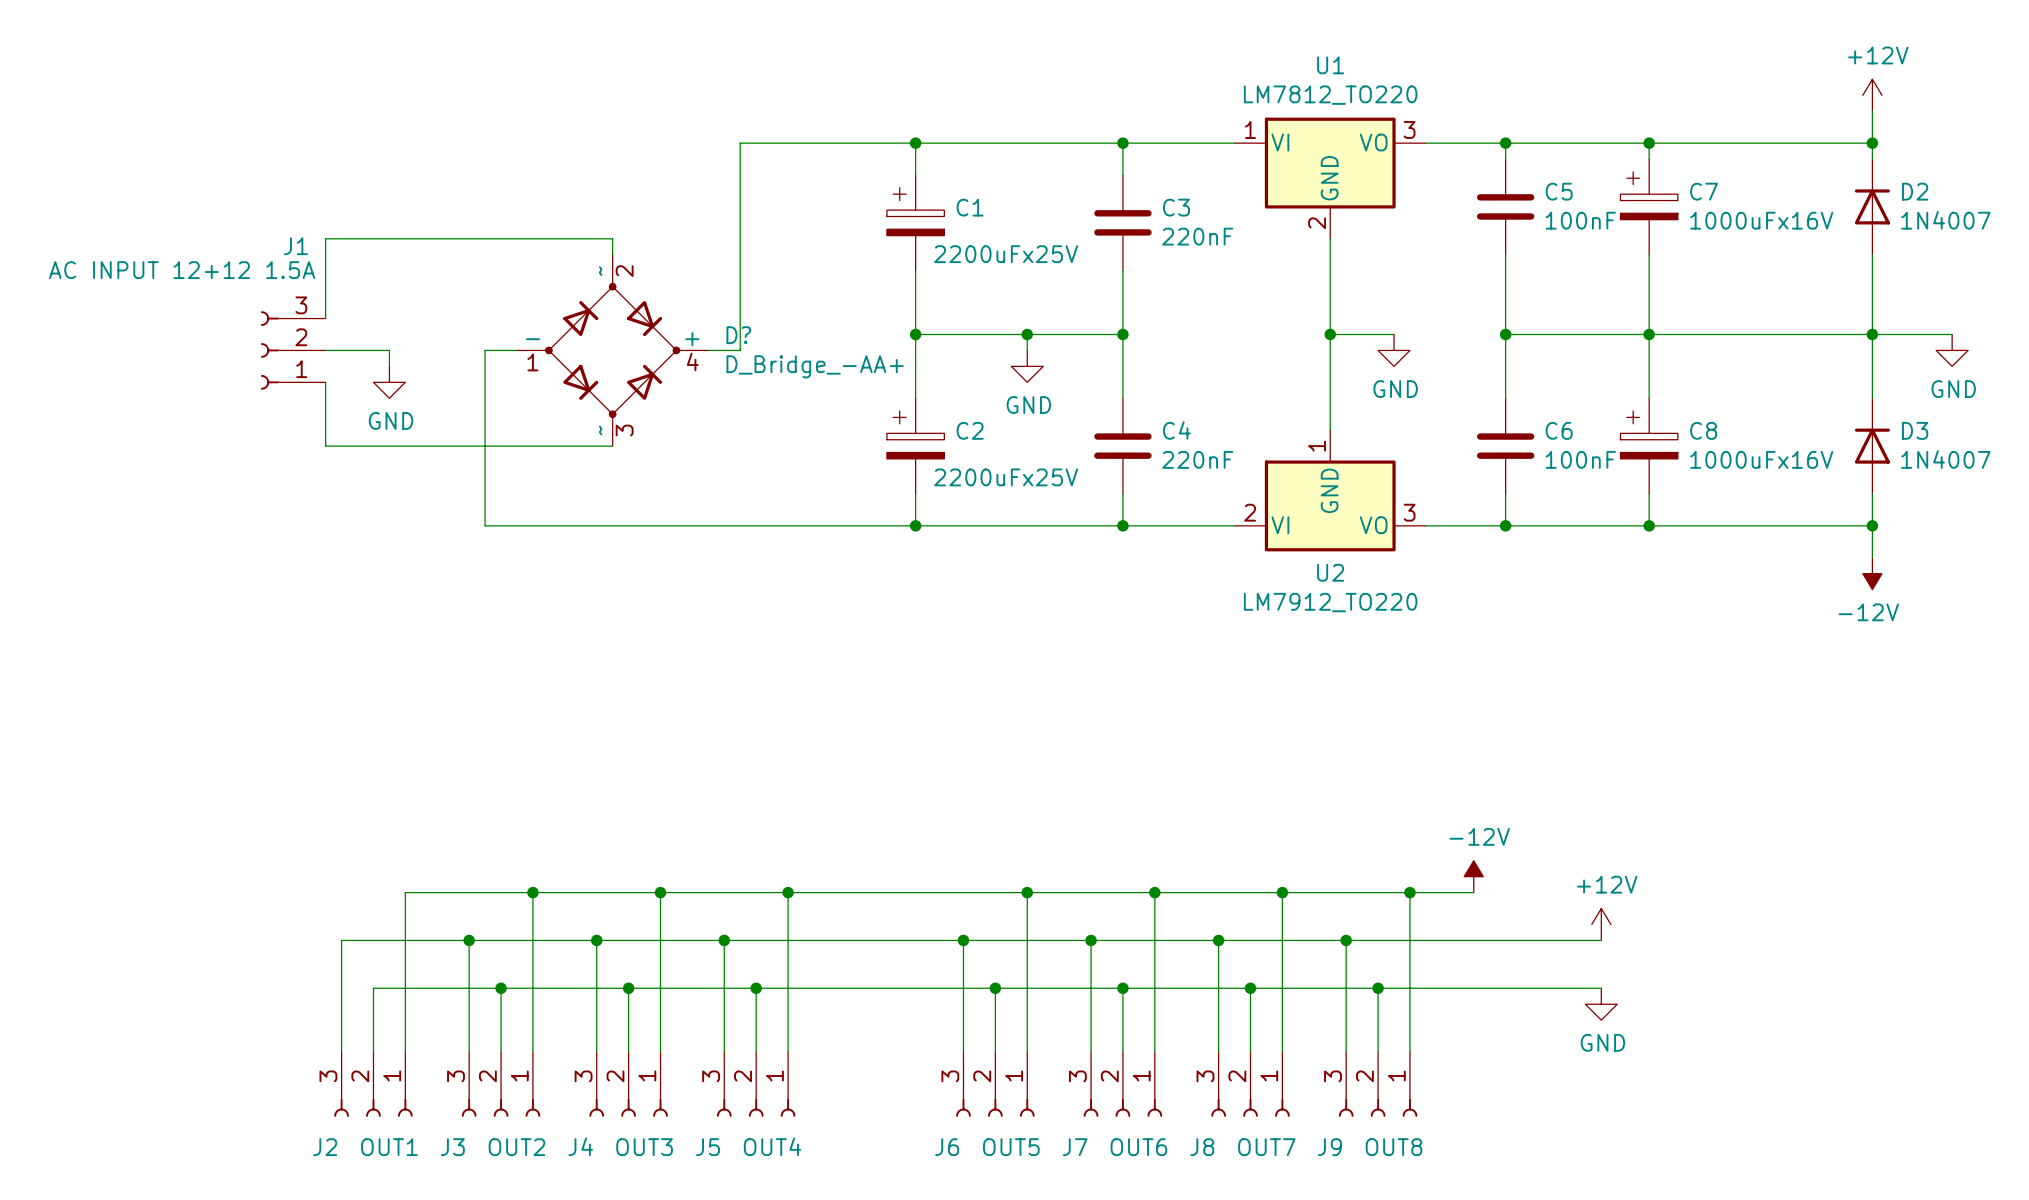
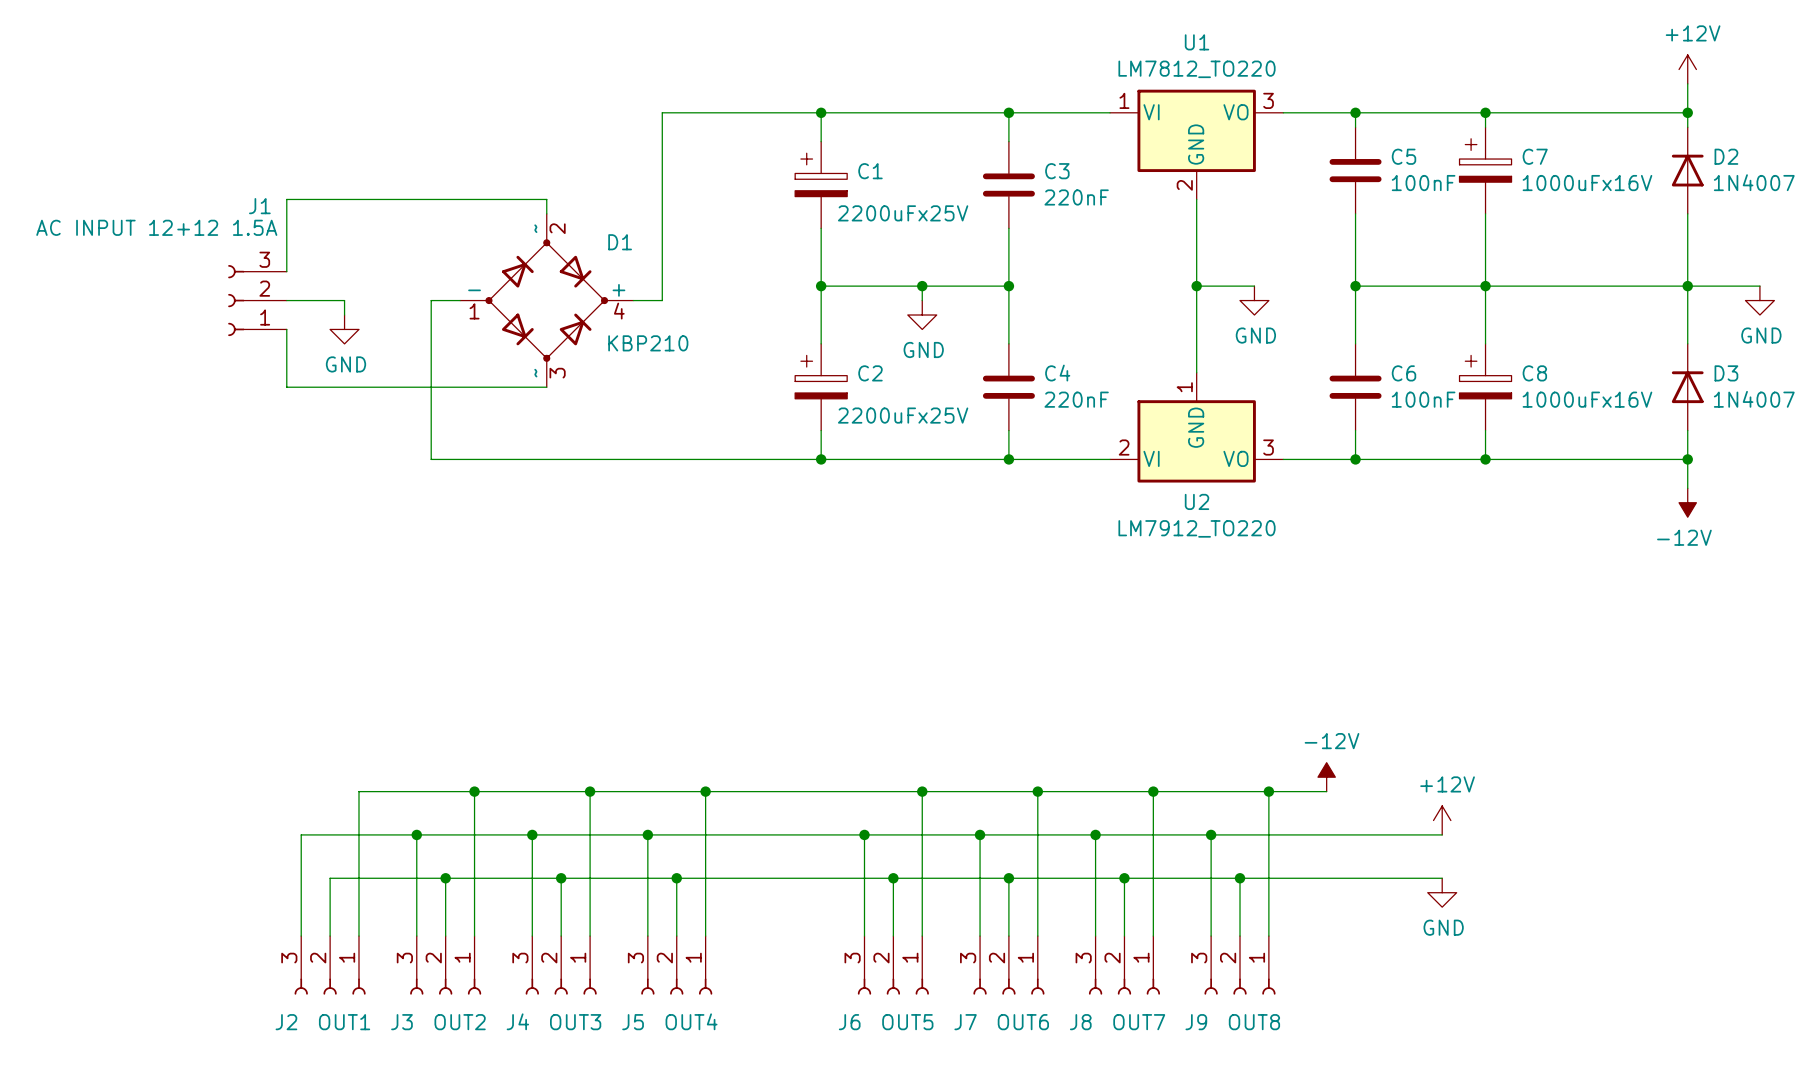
D? name: D? (738, 335) -> D1 (620, 242)
D? value: D_Bridge_-AA+ (815, 366) -> KBP210 (648, 343)

